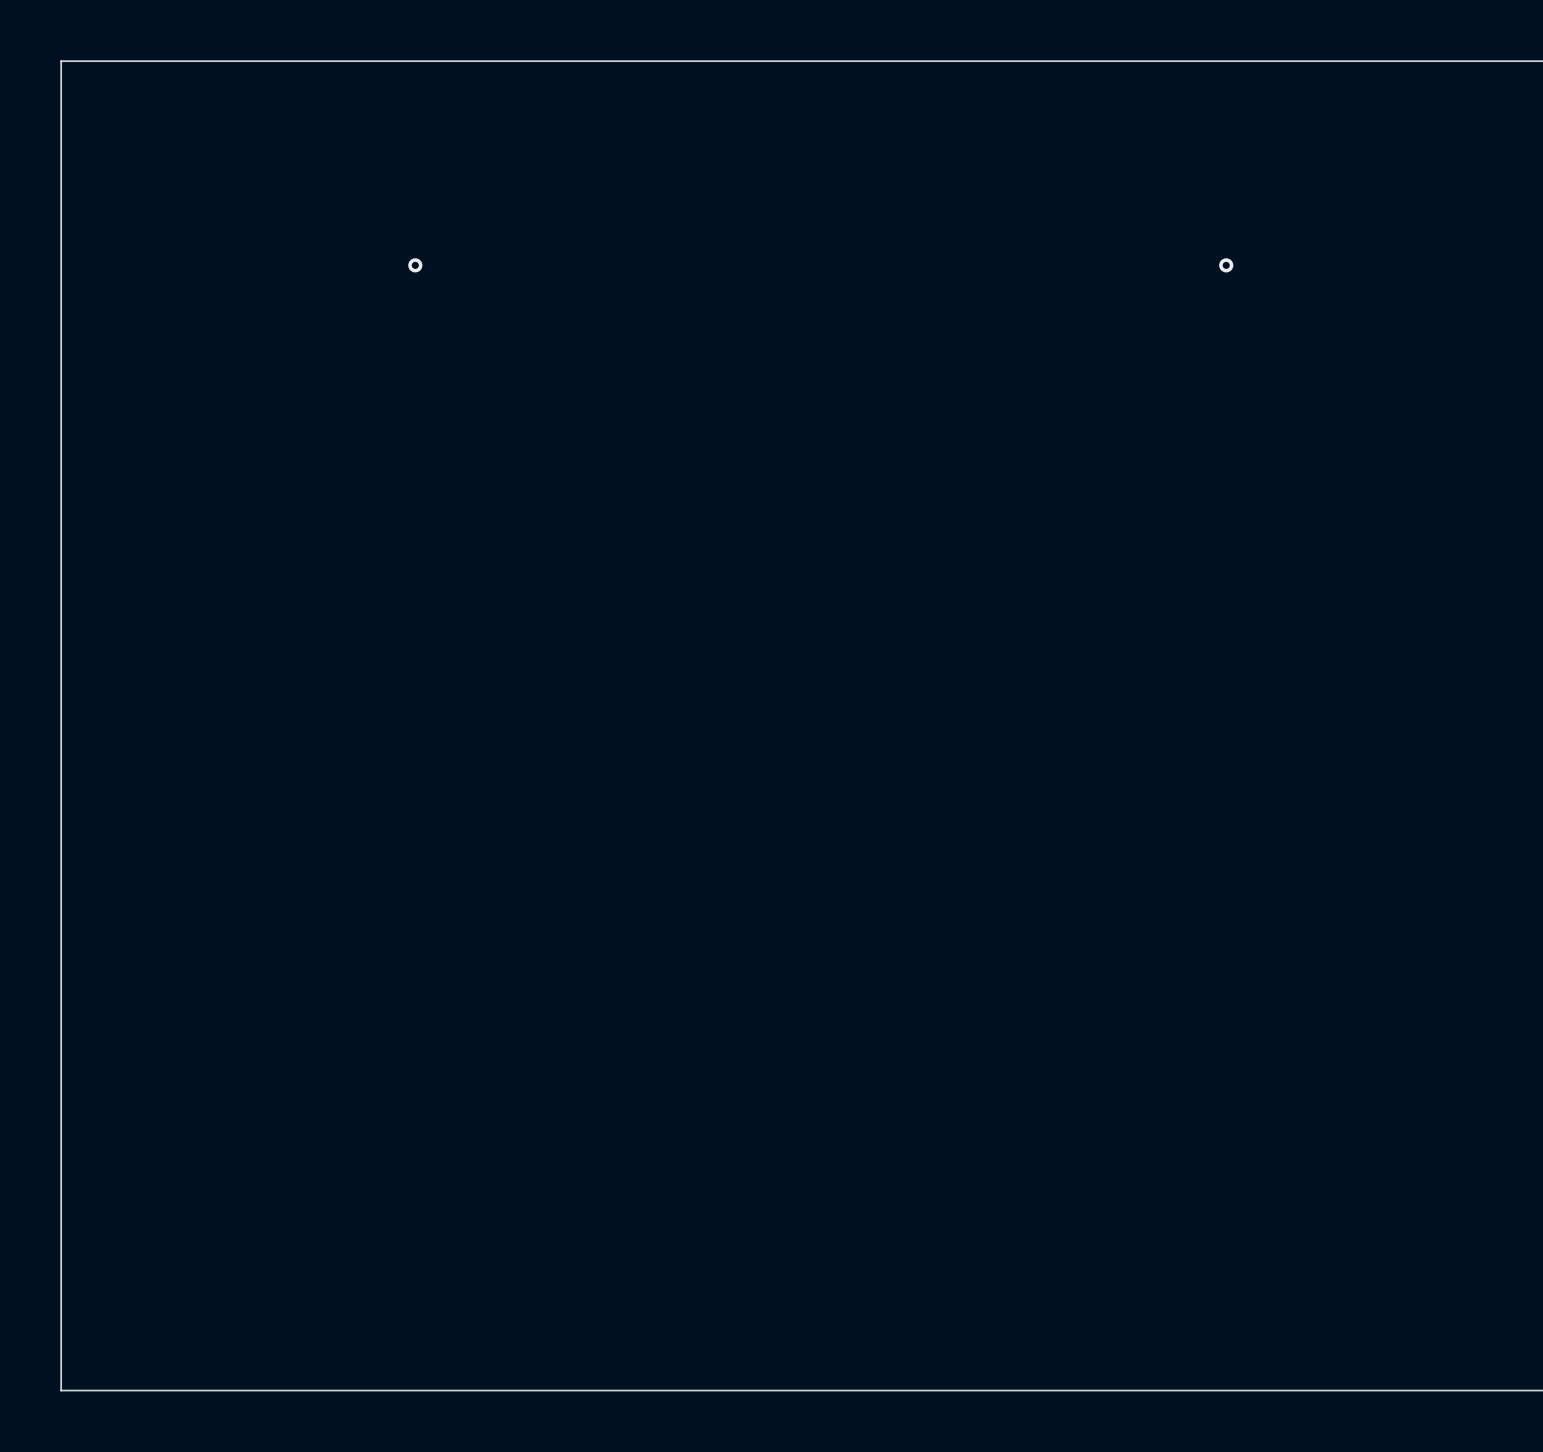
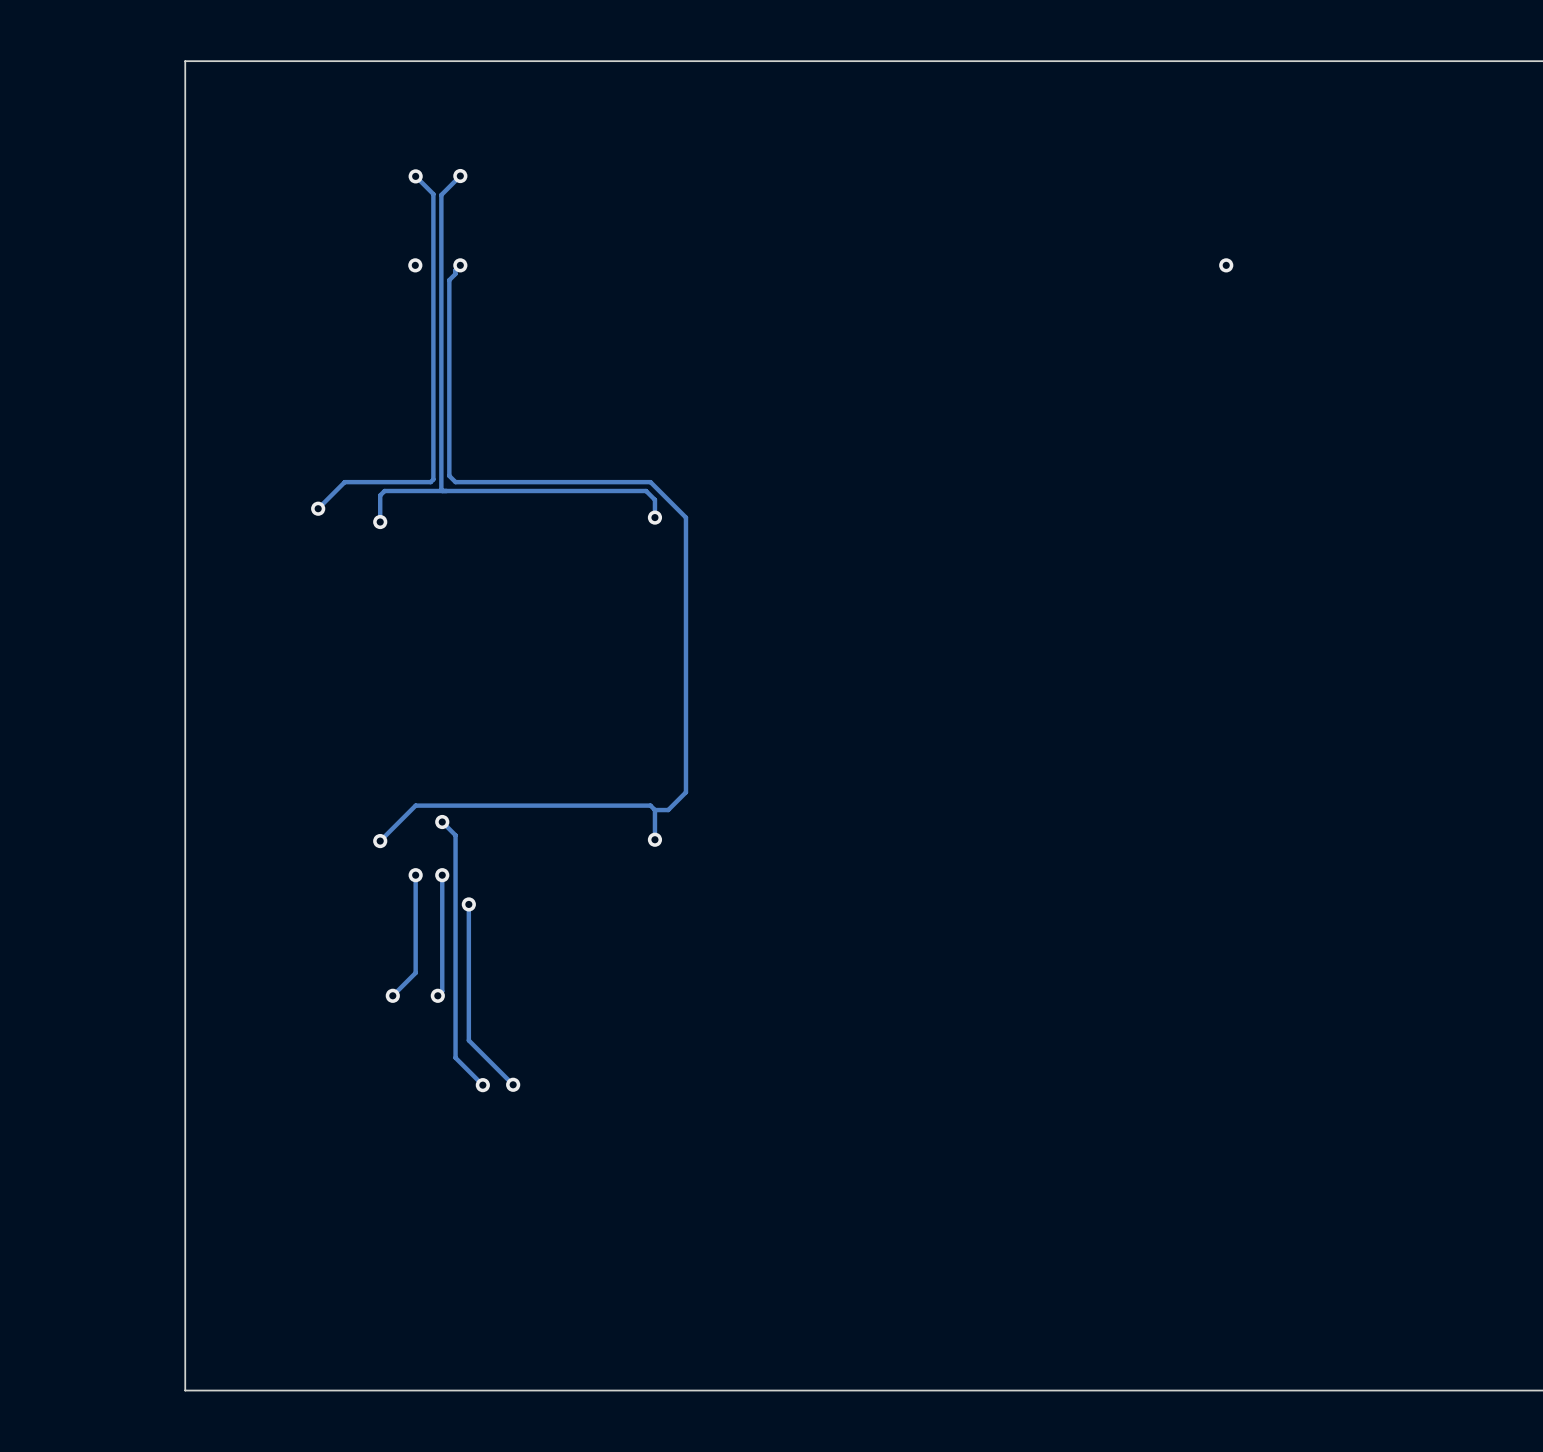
board edge: (185, 61) (61, 61) (61, 1390) (185, 1390) -> (185, 61) (185, 1390)
track: none -> (415, 176) (433, 194) (433, 479) (430, 482) (344, 482) (318, 508)
via: none -> (415, 176)
track: none -> (460, 176) (441, 194) (442, 490)
via: none -> (460, 176)
track: none -> (460, 265) (449, 280) (449, 475) (455, 482) (650, 482) (685, 517) (685, 792) (668, 810) (654, 810)
via: none -> (460, 265)
via: none -> (318, 508)
track: none -> (654, 517) (654, 499) (646, 490) (384, 490) (380, 495) (380, 522)
via: none -> (654, 517)
via: none -> (380, 522)
track: none -> (654, 810) (654, 839)
track: none -> (654, 810) (650, 805) (415, 805) (380, 841)
track: none -> (442, 822) (455, 835) (455, 1057) (482, 1085)
via: none -> (442, 822)
via: none -> (654, 839)
via: none -> (380, 841)
track: none -> (415, 875) (415, 972) (392, 995)
via: none -> (415, 875)
track: none -> (442, 875) (442, 991) (437, 995)
via: none -> (442, 875)
track: none -> (468, 904) (468, 1040) (513, 1084)
via: none -> (468, 904)
via: none -> (392, 995)
via: none -> (437, 995)
via: none -> (513, 1084)
via: none -> (482, 1085)

